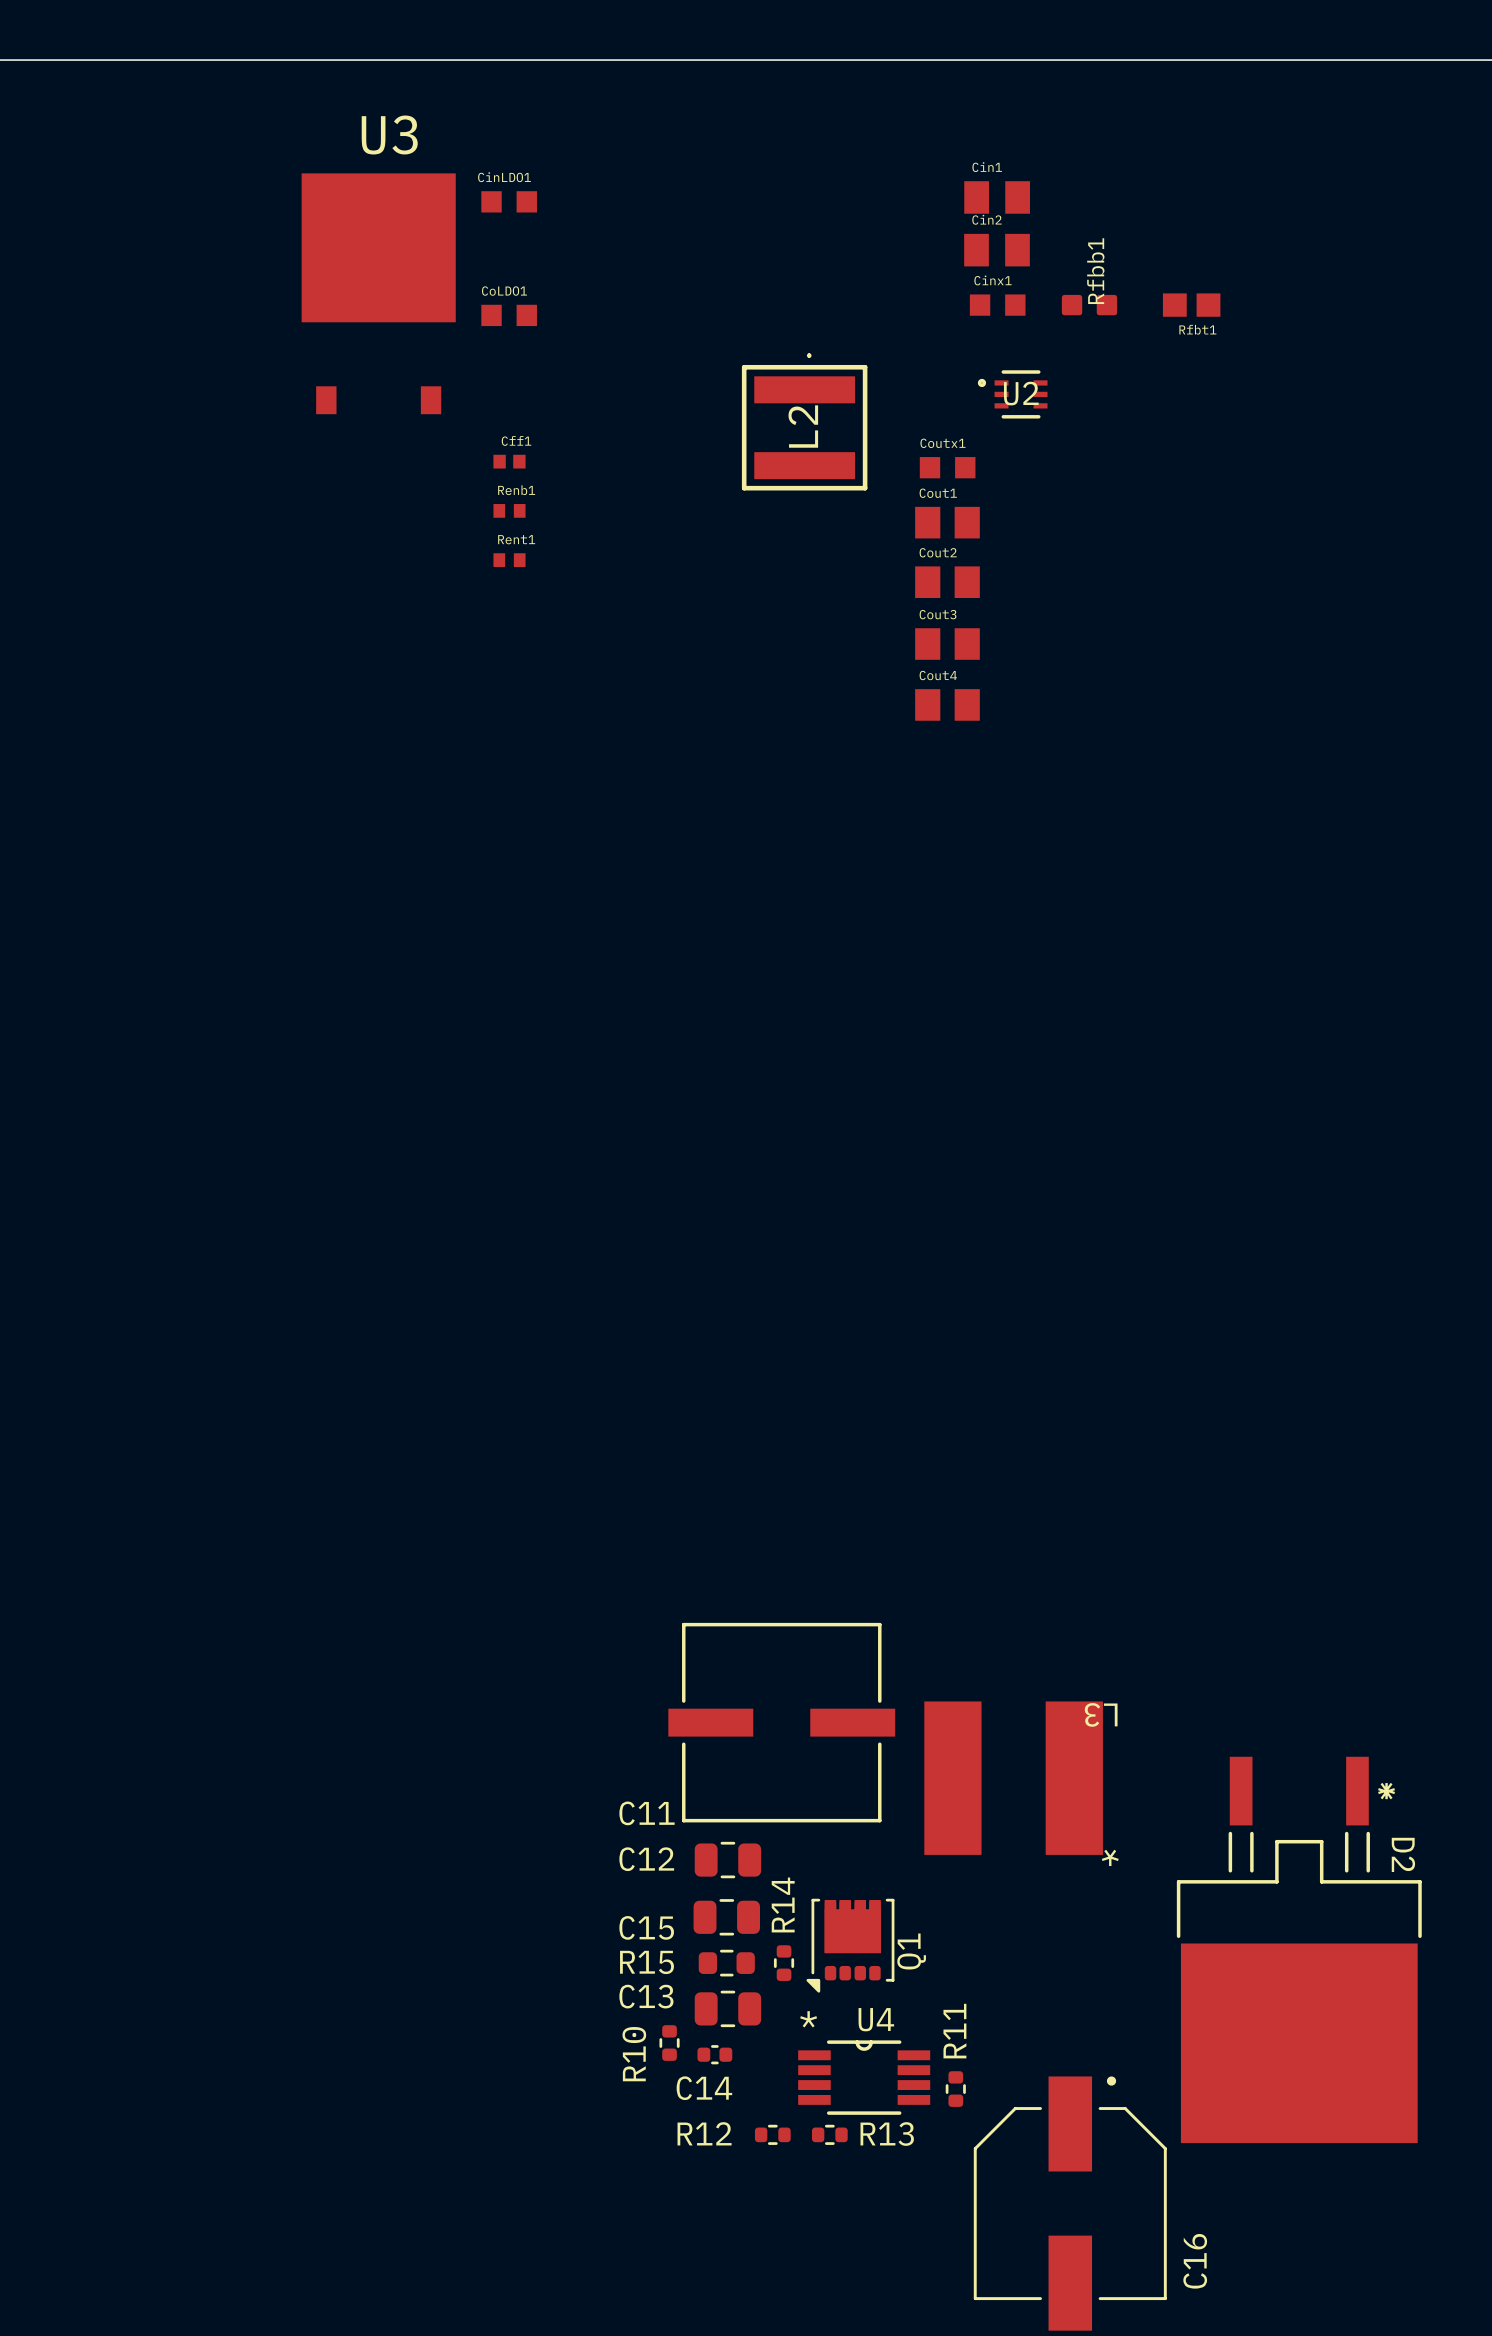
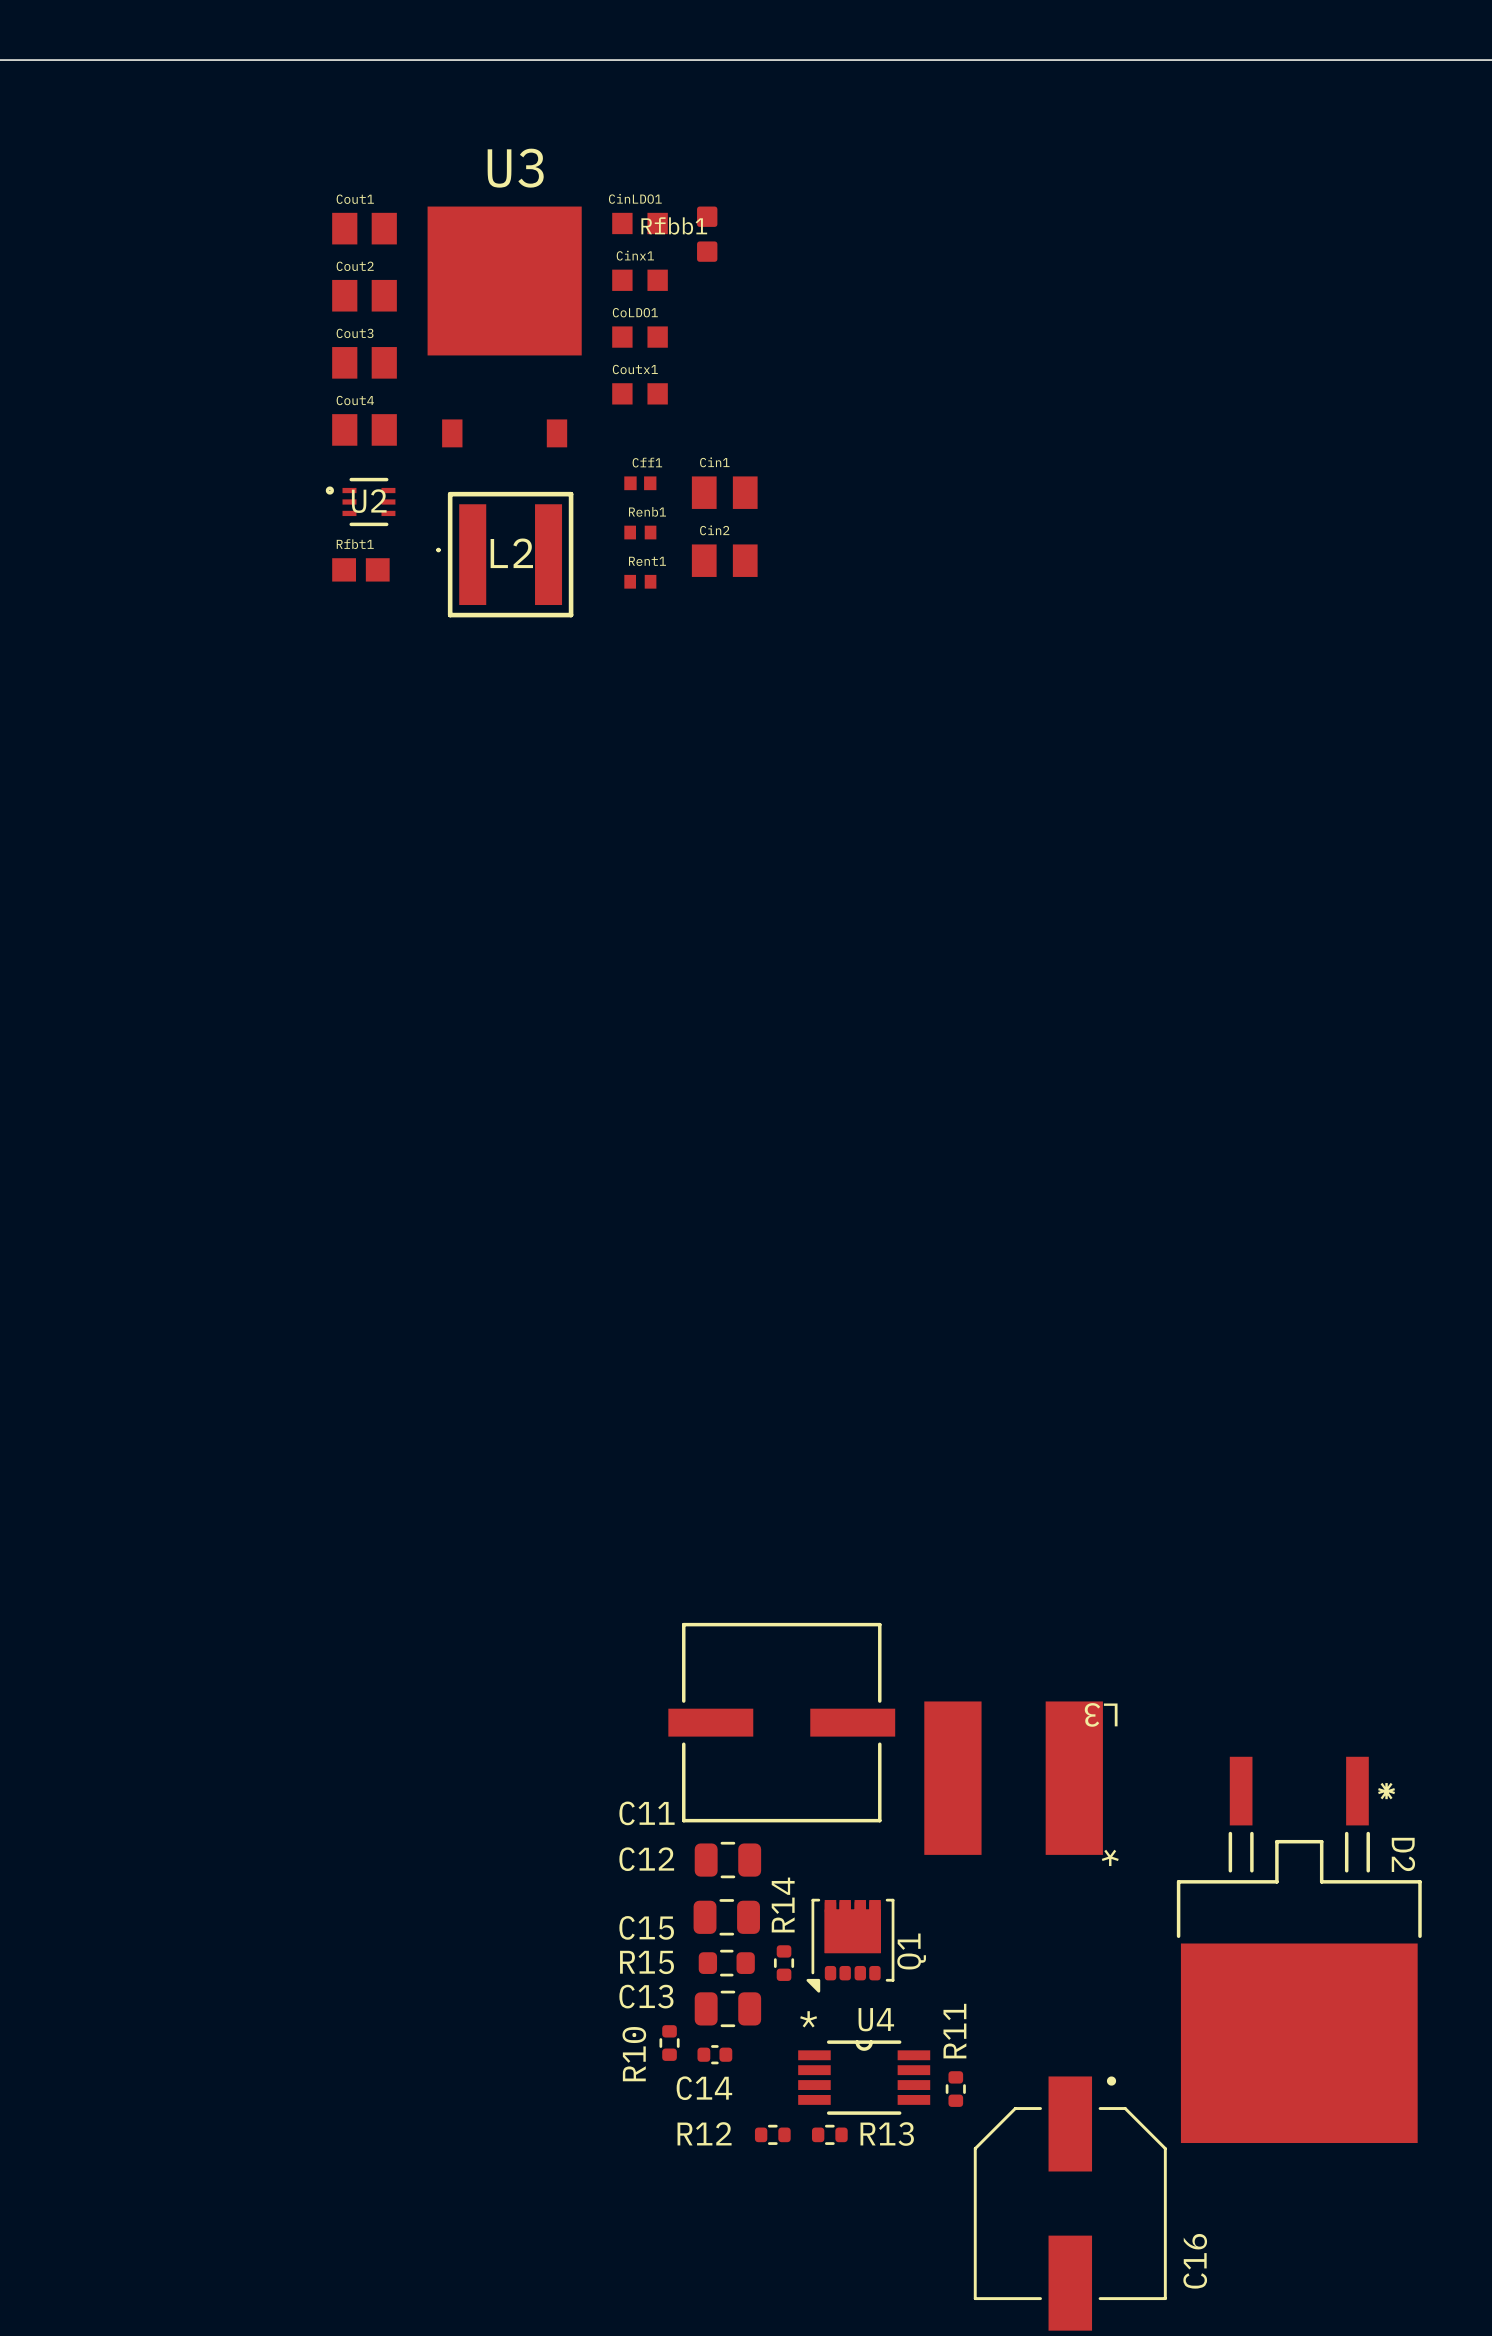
Cin1 position: (997, 197) -> (724, 492)
CinLDO1 position: (509, 201) -> (640, 223)
Cin2 position: (997, 250) -> (724, 560)
Rfbb1 name position: Rfbb1 (1095, 271) -> Rfbb1 (674, 225)
U3 position: (378, 293) -> (504, 326)
Cinx1 position: (997, 305) -> (640, 280)
Rfbb1 rotation: 0° (1089, 305) -> 90° clockwise (707, 234)
Rfbb1 position: (1089, 305) -> (707, 234)
Rfbt1 position: (1191, 305) -> (360, 569)
CoLDO1 position: (509, 315) -> (640, 337)
Rfbt1 name position: Rfbt1 (1197, 329) -> Rfbt1 (355, 544)
U2 position: (1012, 394) -> (360, 501)
L2 rotation: 0° (804, 421) -> 90° counterclockwise (504, 554)
L2 position: (804, 421) -> (504, 554)
Cff1 position: (509, 461) -> (640, 483)
Coutx1 position: (947, 467) -> (640, 393)
Renb1 position: (509, 510) -> (640, 532)
Cout1 position: (947, 522) -> (364, 228)
Rent1 position: (509, 560) -> (640, 581)
Cout2 position: (947, 582) -> (364, 295)
Cout3 position: (947, 644) -> (364, 362)
Cout4 position: (947, 704) -> (364, 429)

